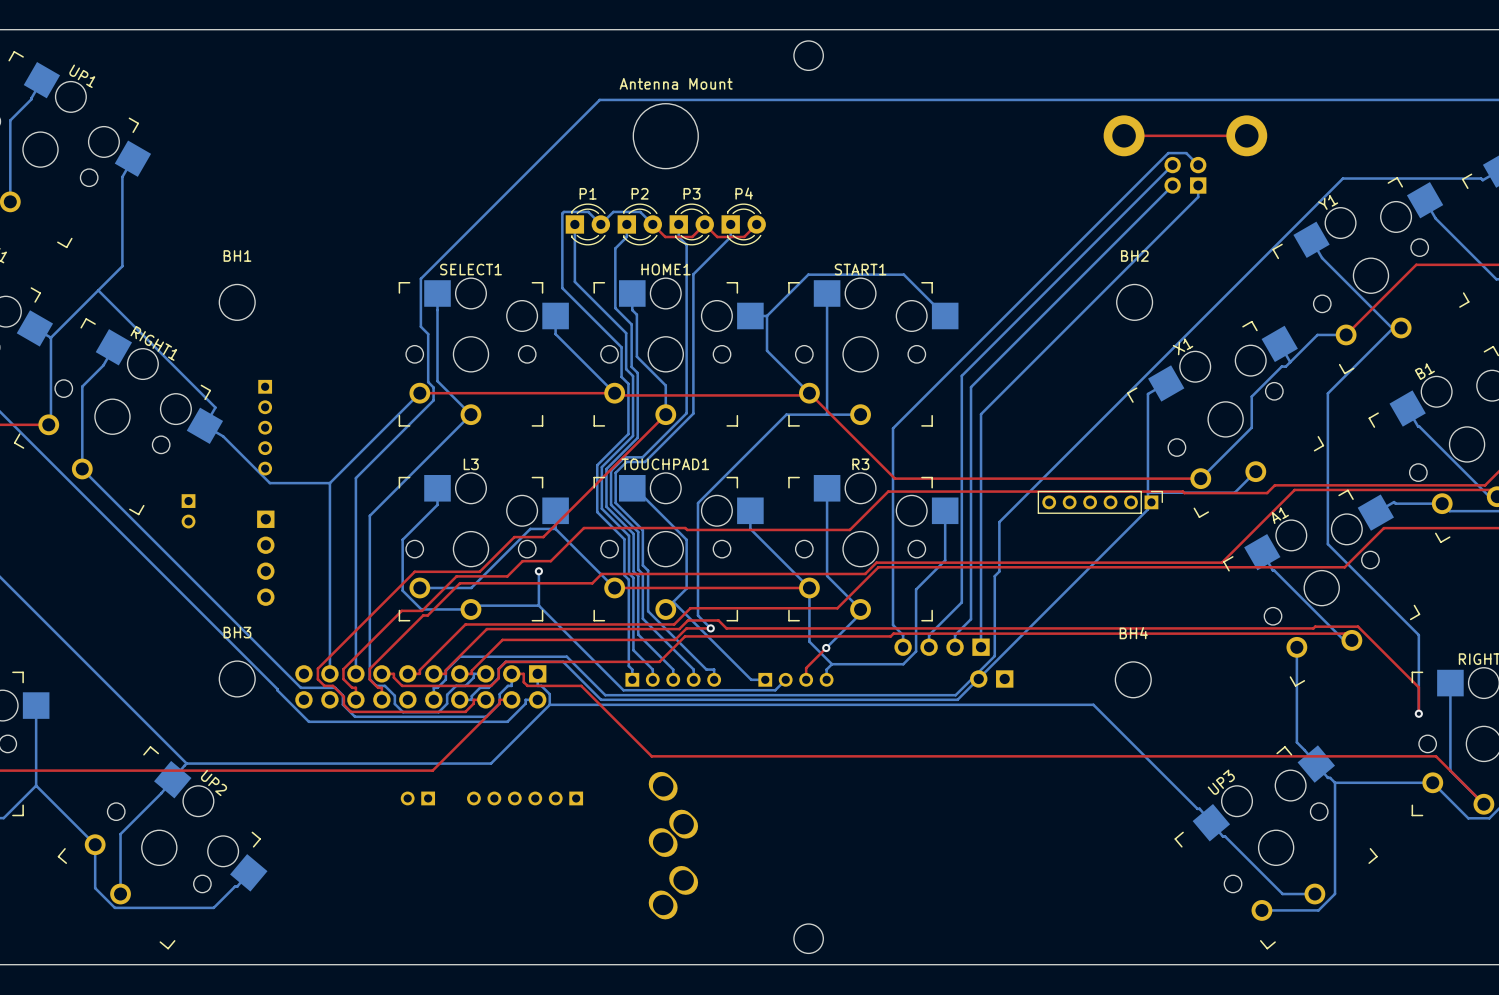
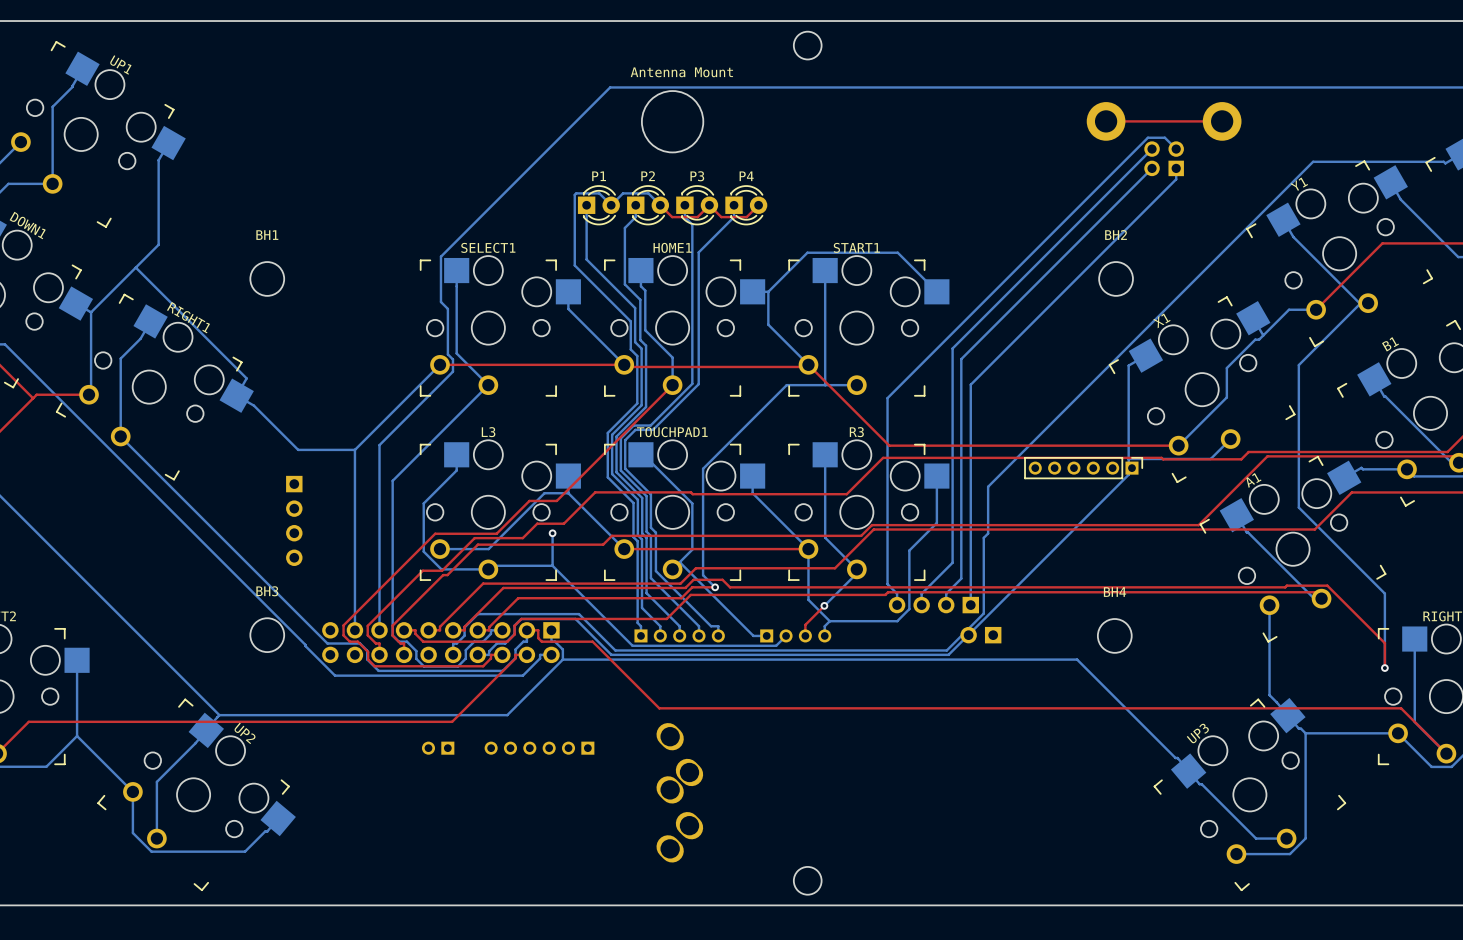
part: (265, 427) -> none
part: (188, 511) -> none

